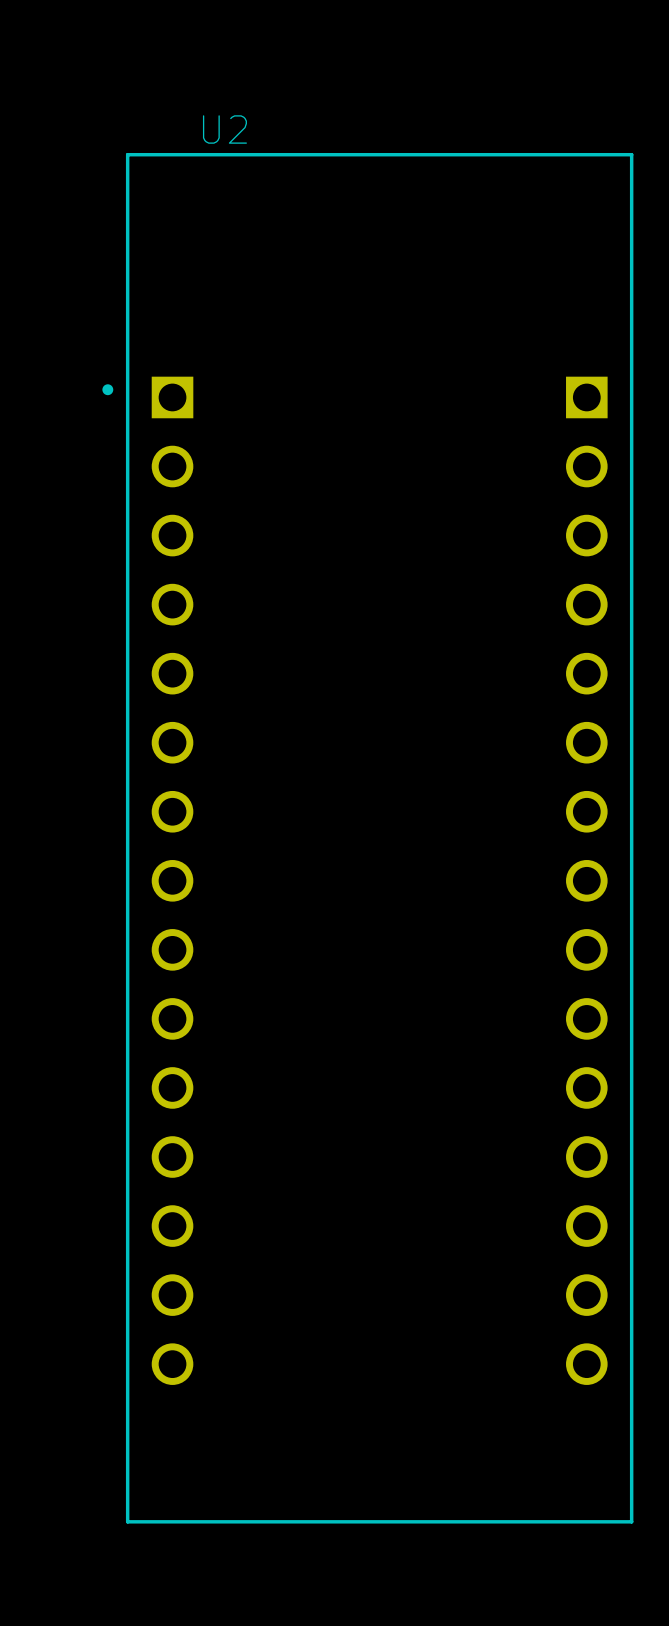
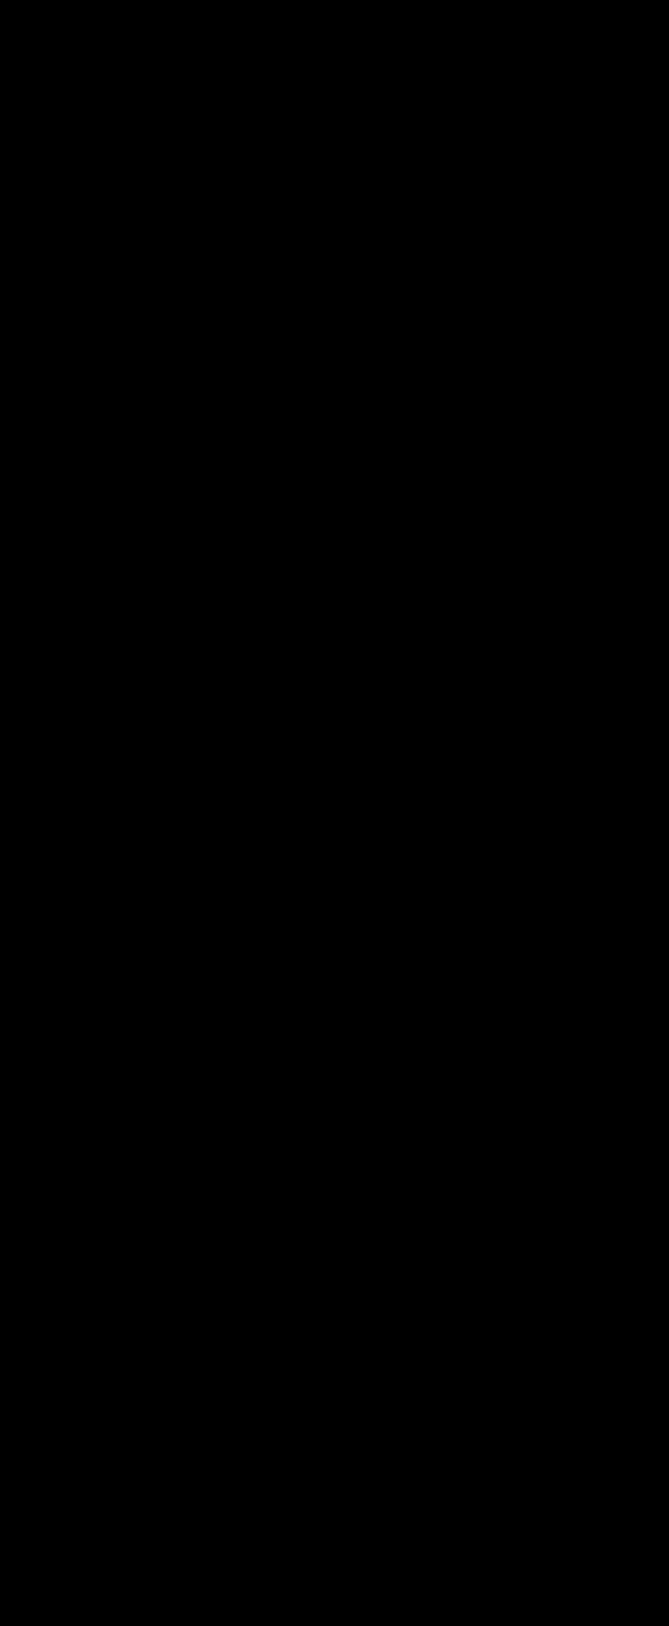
U2: (367, 838) -> none

